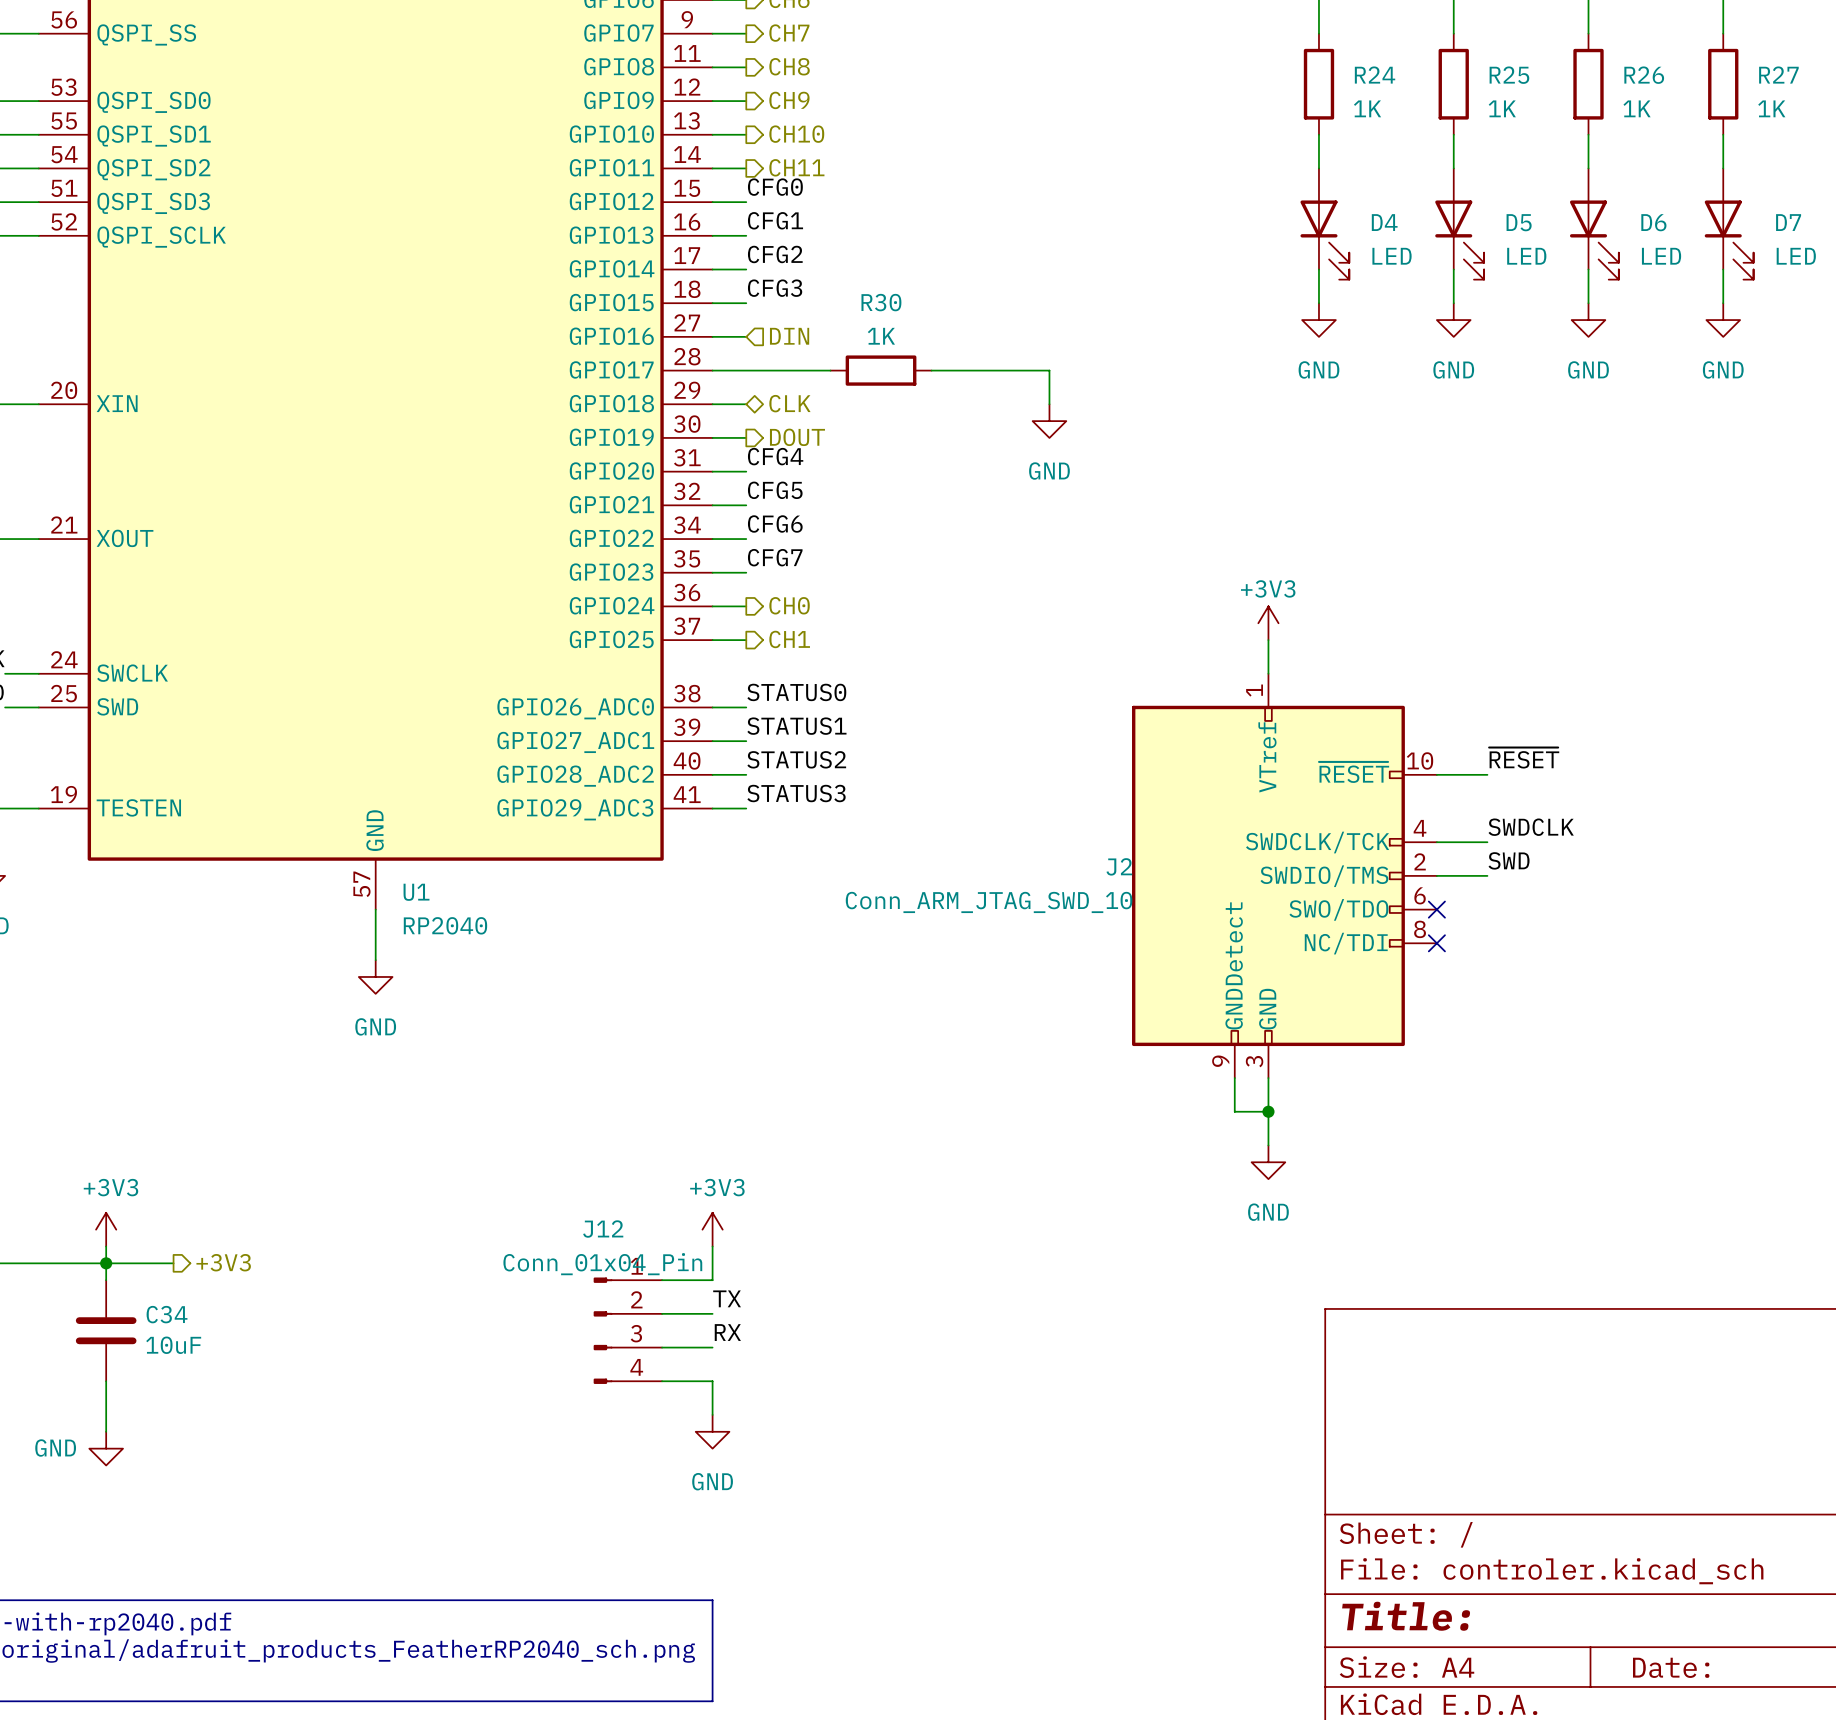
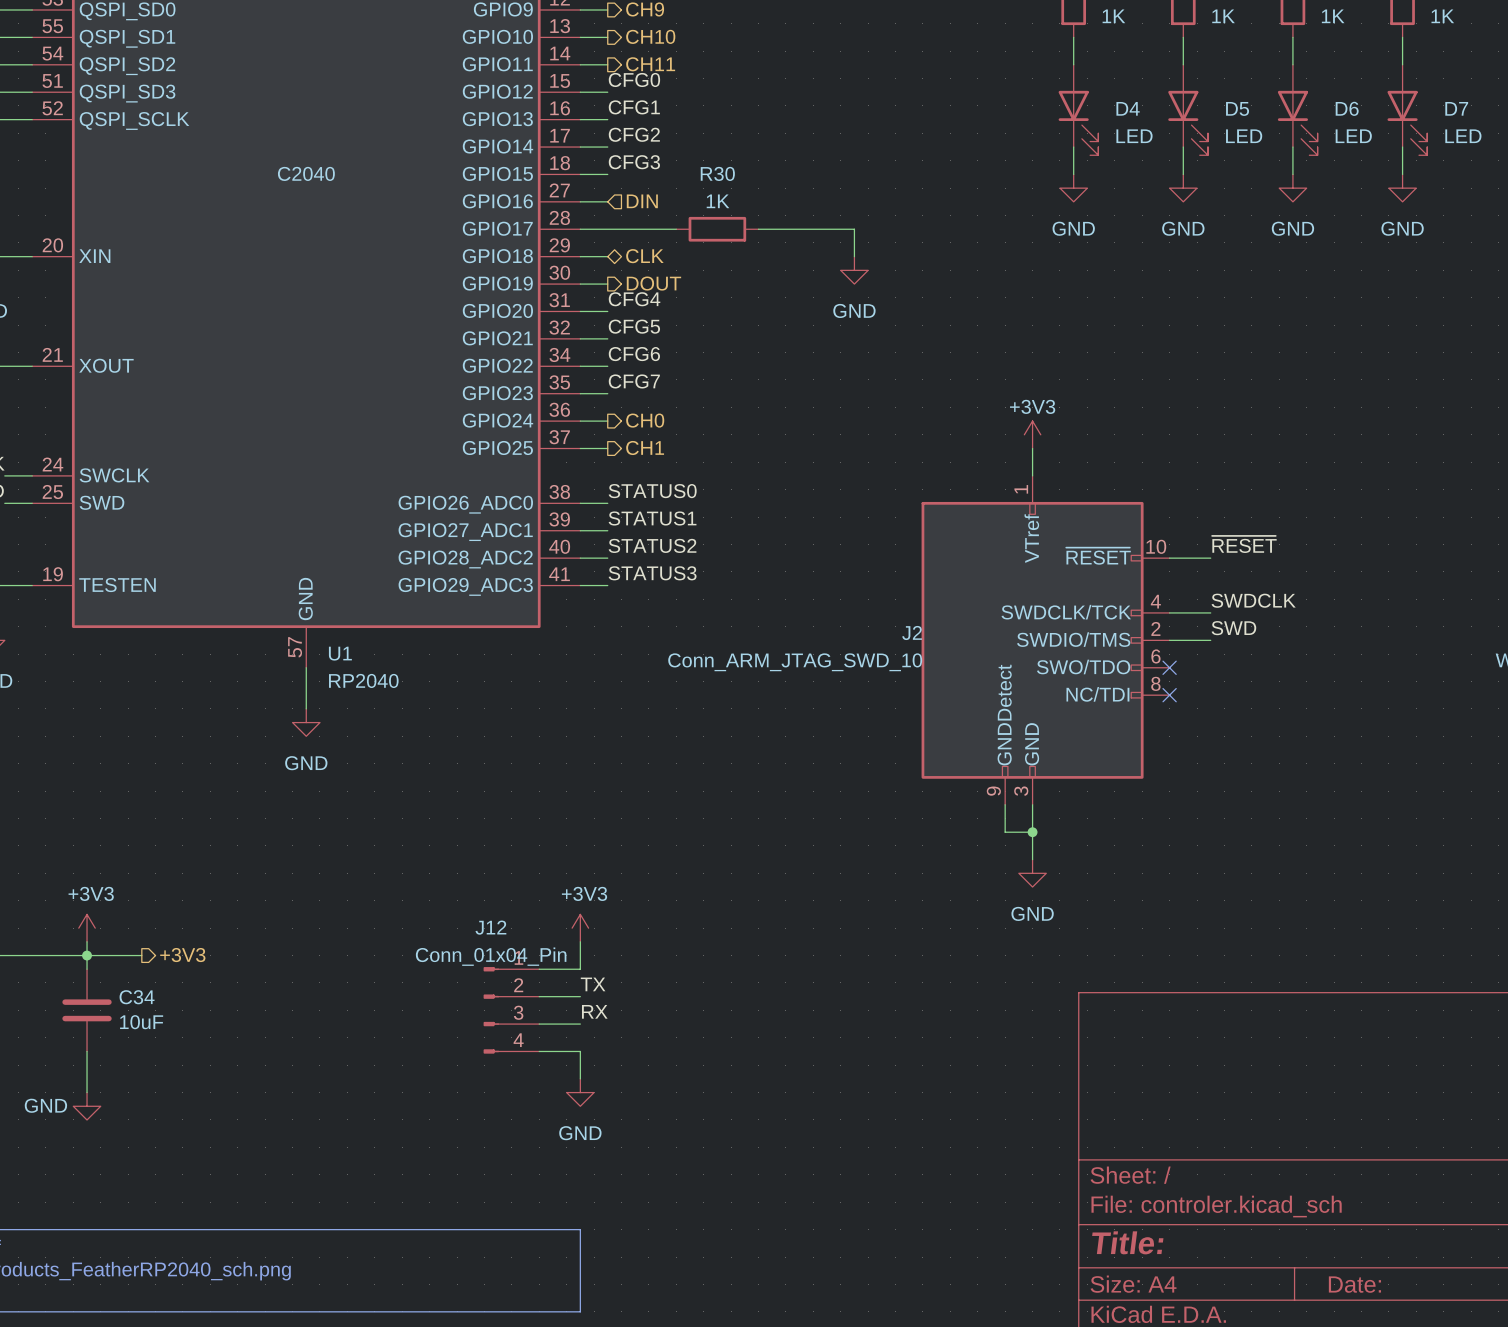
U1 text: none -> C2040 (306, 173)

